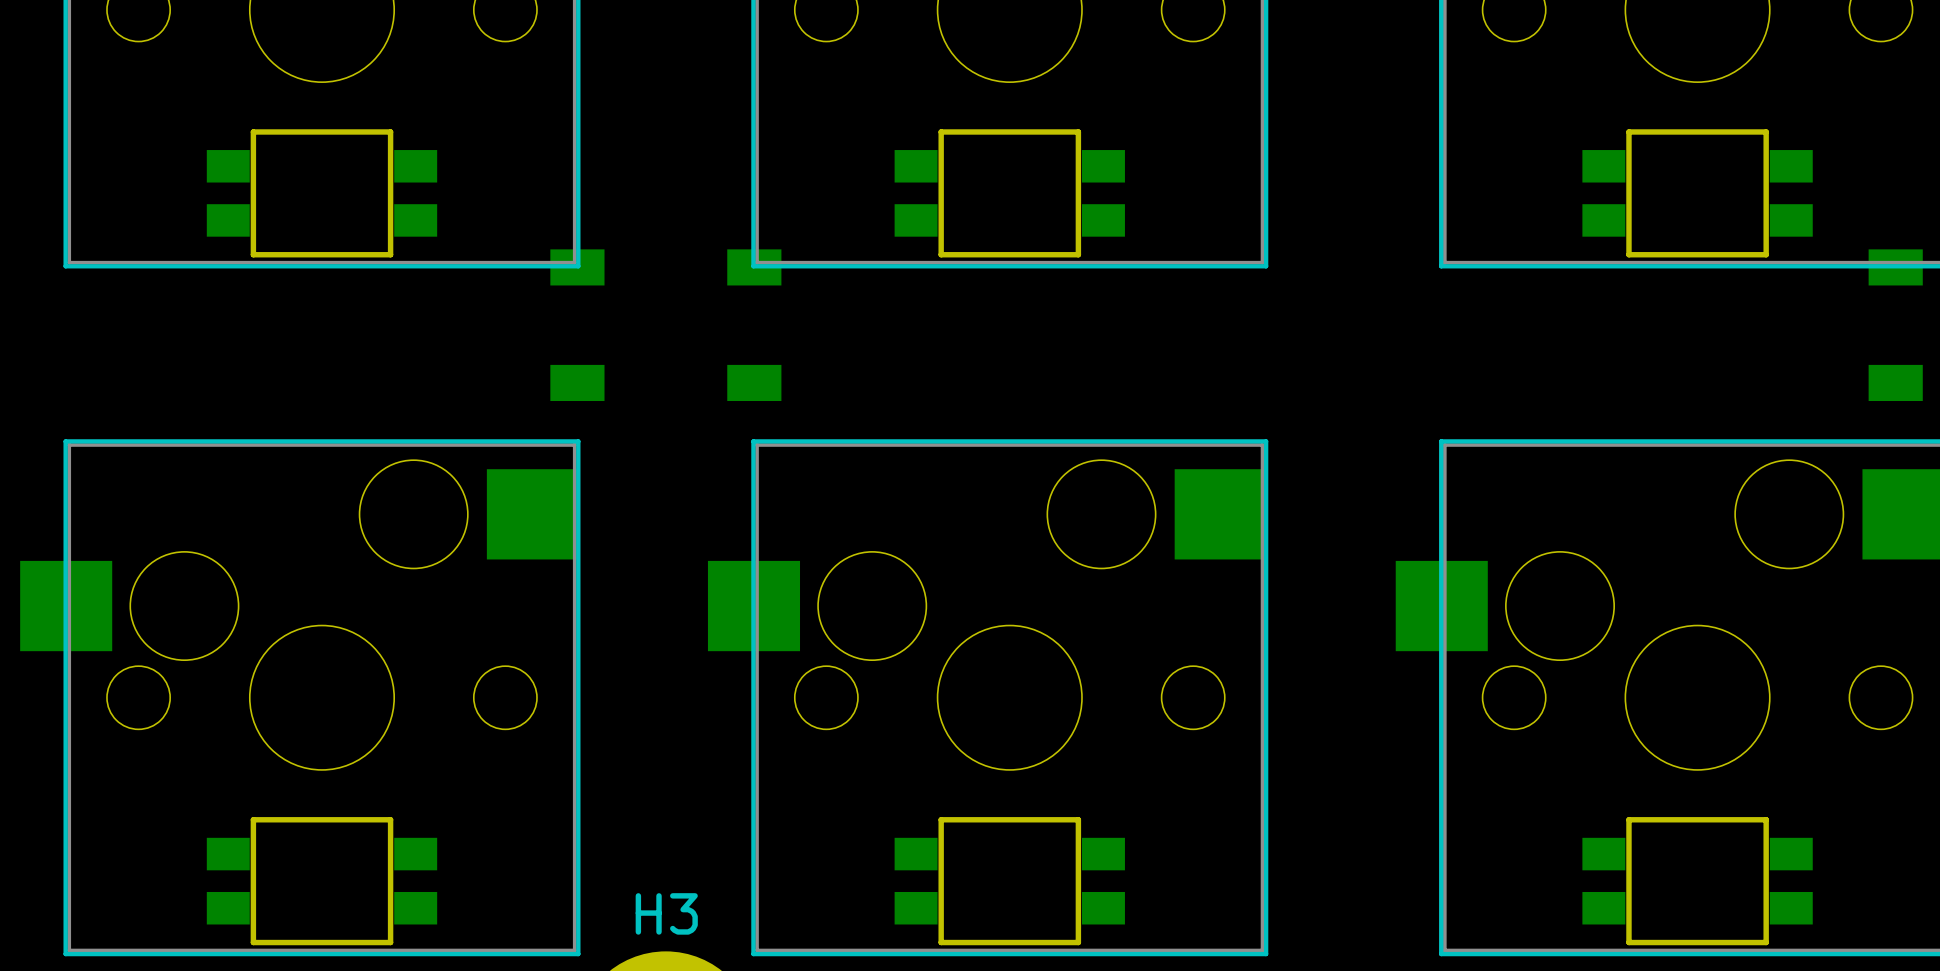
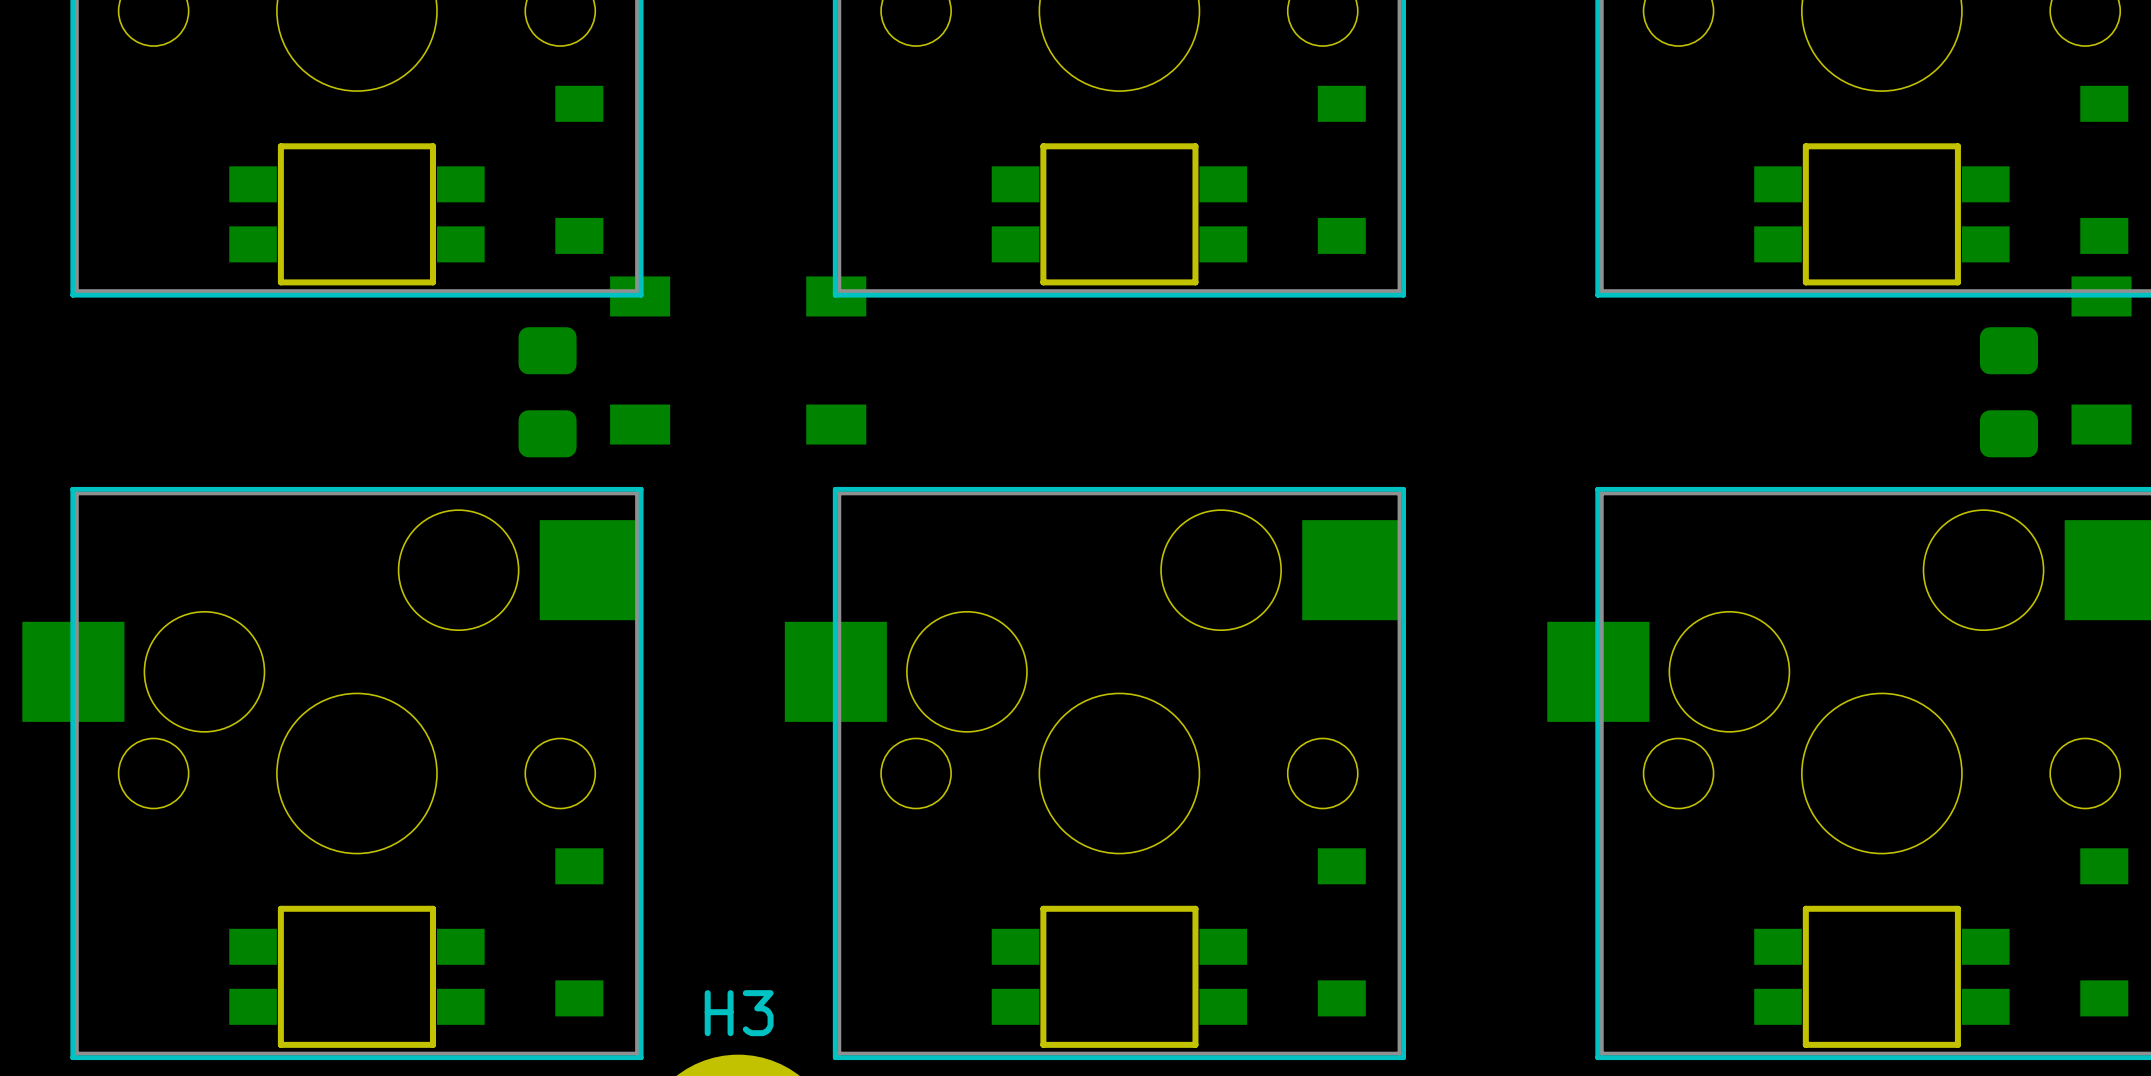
part: none -> (579, 169)
part: none -> (1341, 169)
part: none -> (2104, 169)
part: none -> (547, 392)
part: none -> (2008, 392)
part: none -> (579, 932)
part: none -> (1341, 932)
part: none -> (2104, 932)

